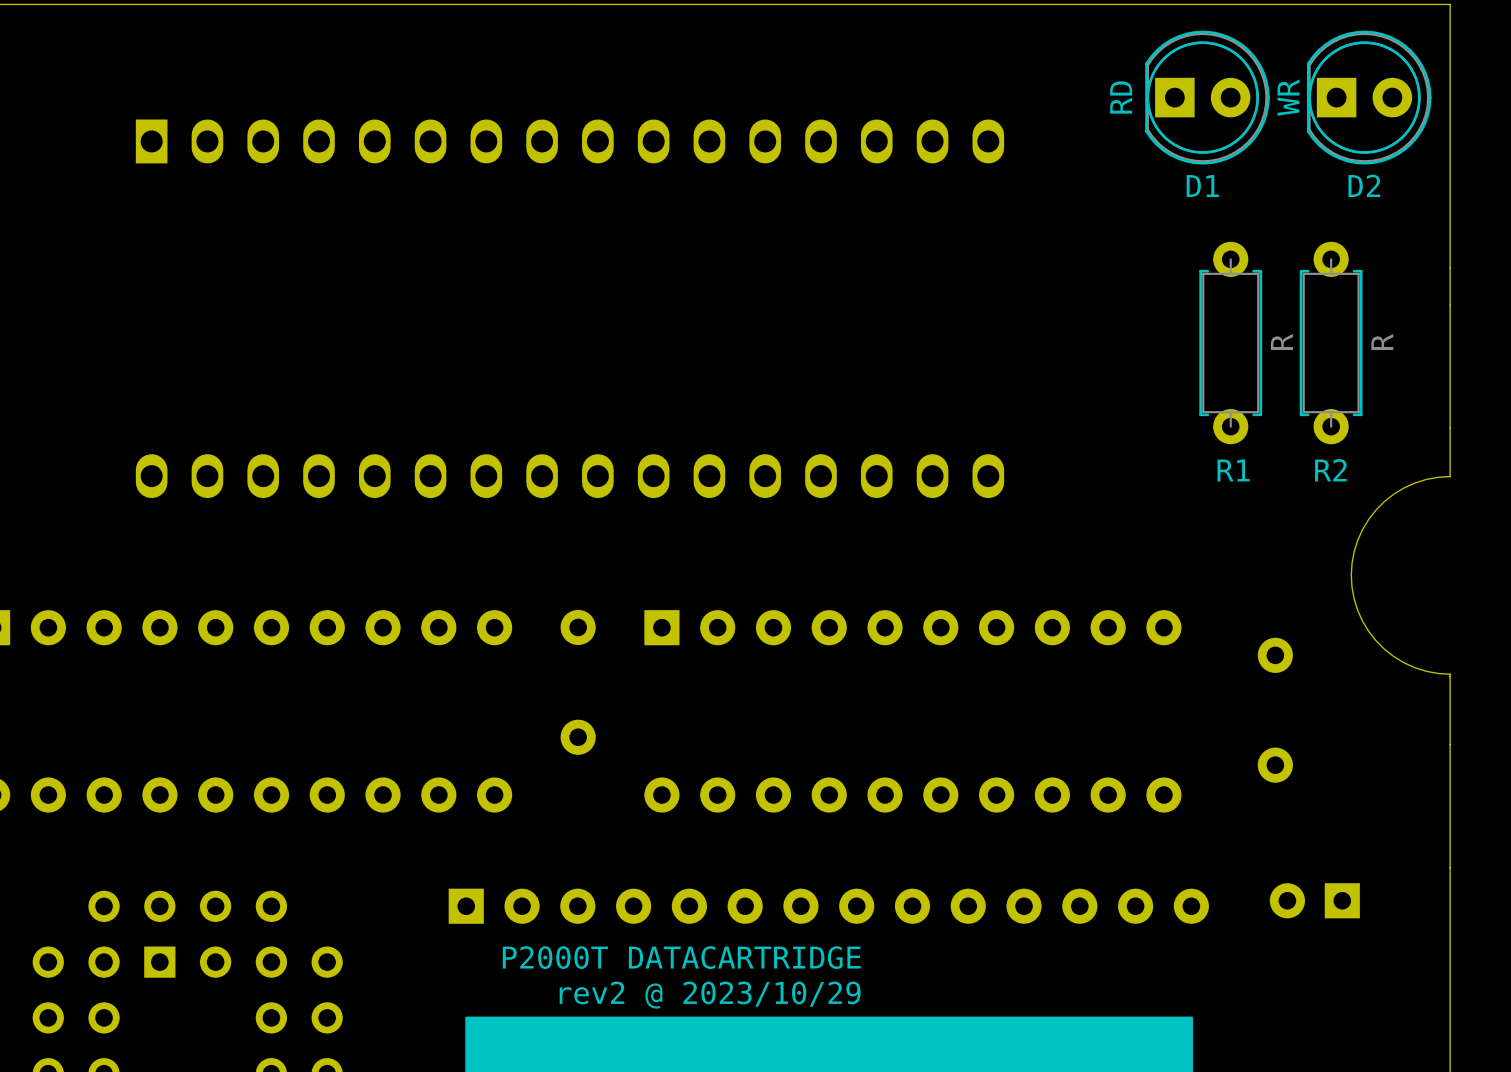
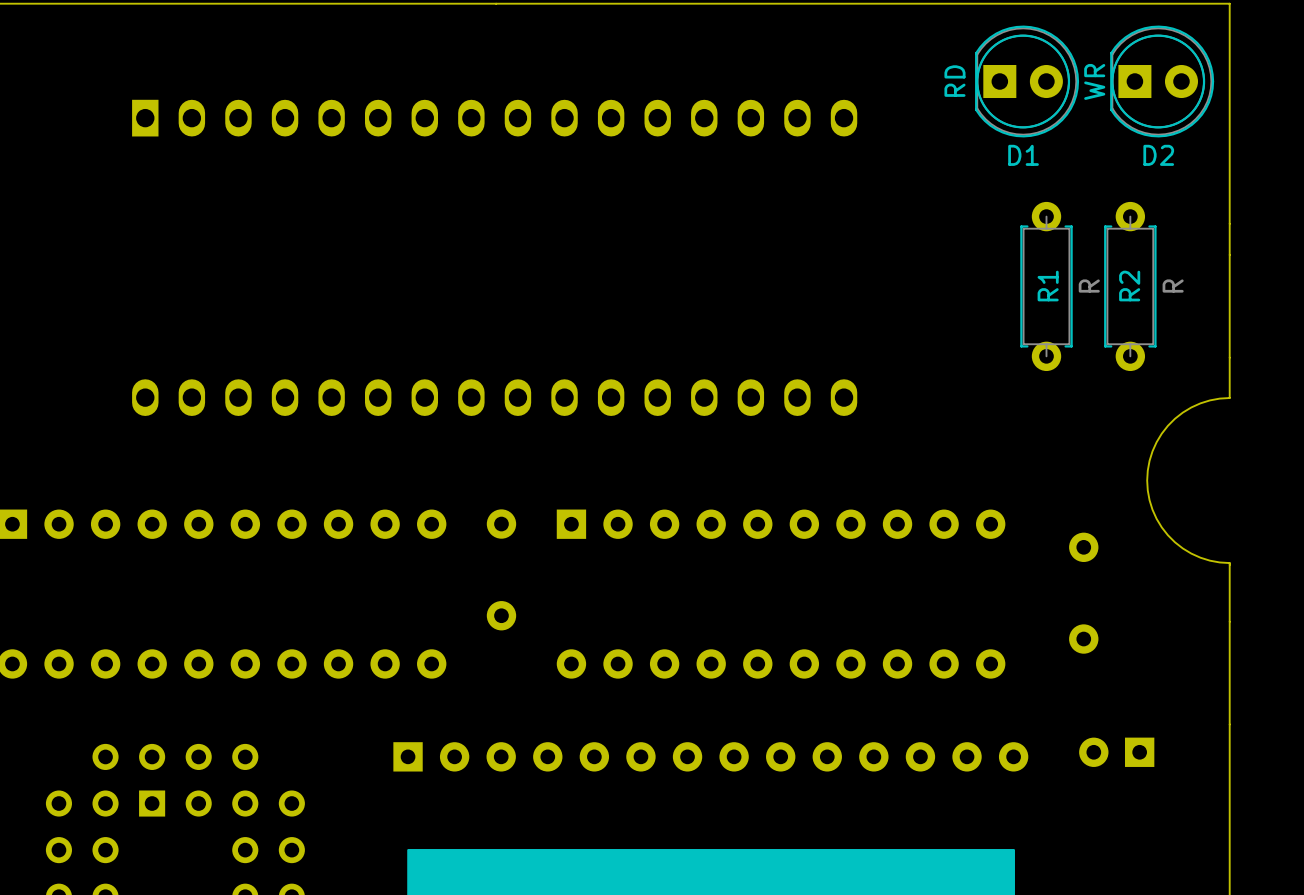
R1 name rotation: 0° (1233, 470) -> 90° counterclockwise (1048, 286)
R1 name position: R1 (1233, 470) -> R1 (1048, 286)
R2 name rotation: 0° (1330, 470) -> 90° counterclockwise (1129, 286)
R2 name position: R2 (1330, 470) -> R2 (1129, 286)
text: P2000T DATACARTRIDGE (681, 957) -> none
text: rev2 @ 2023/10/29 (710, 995) -> none

